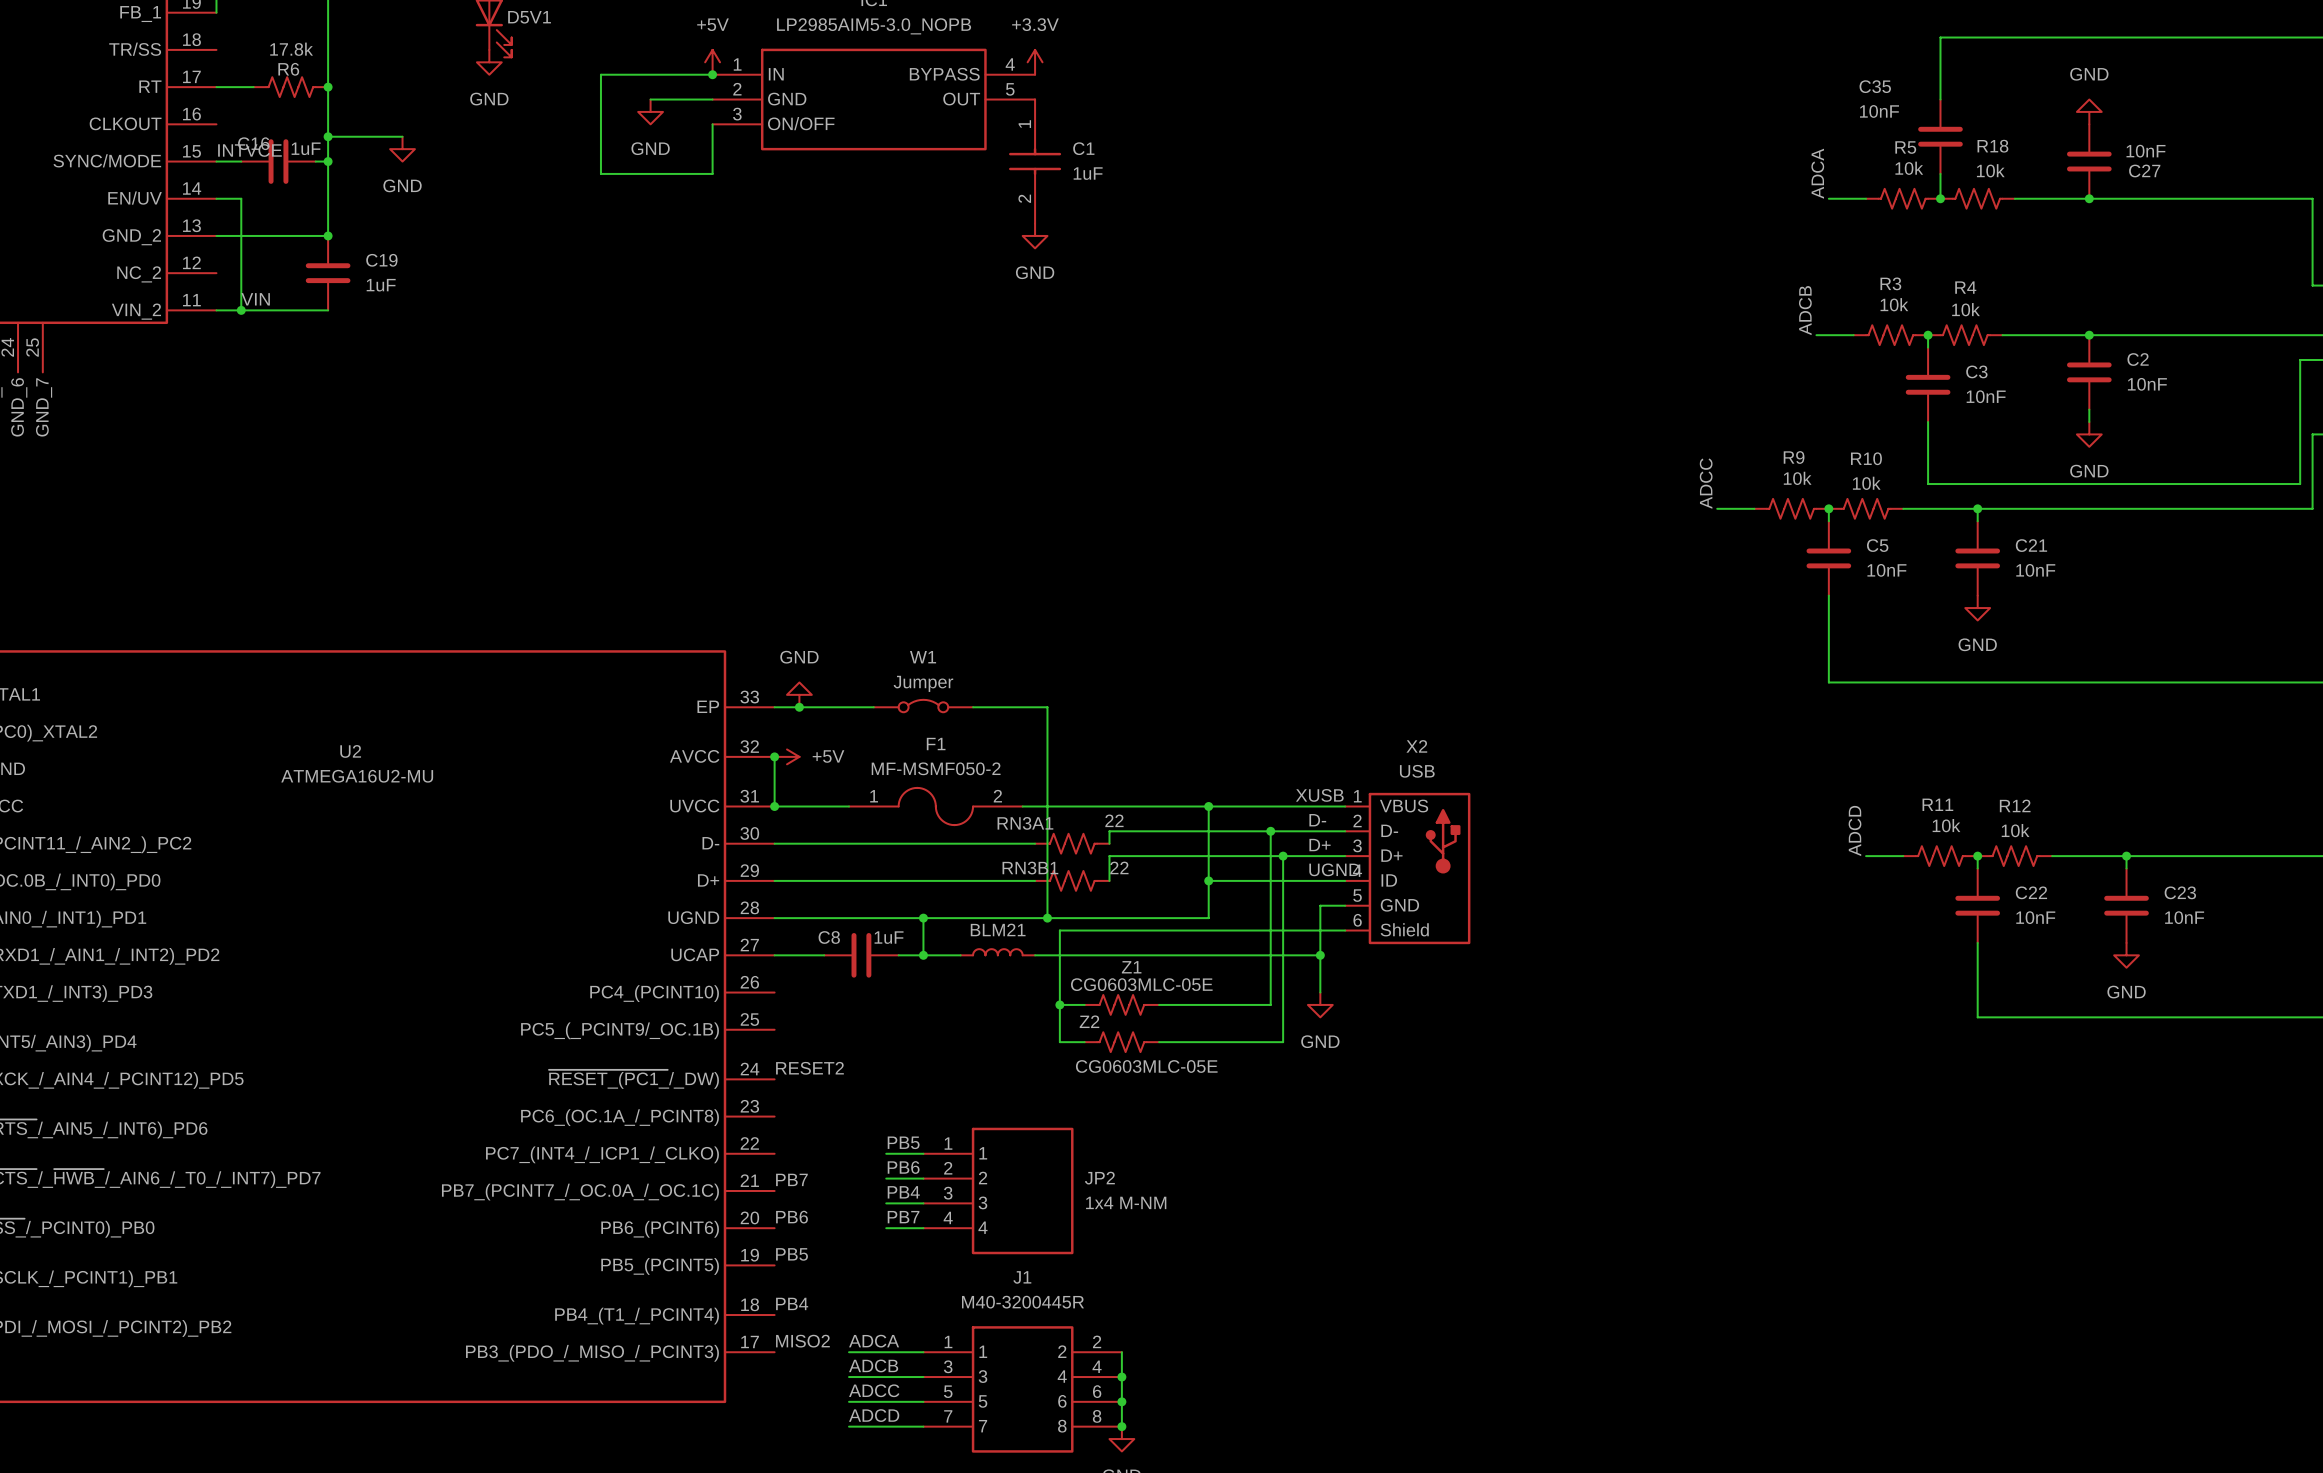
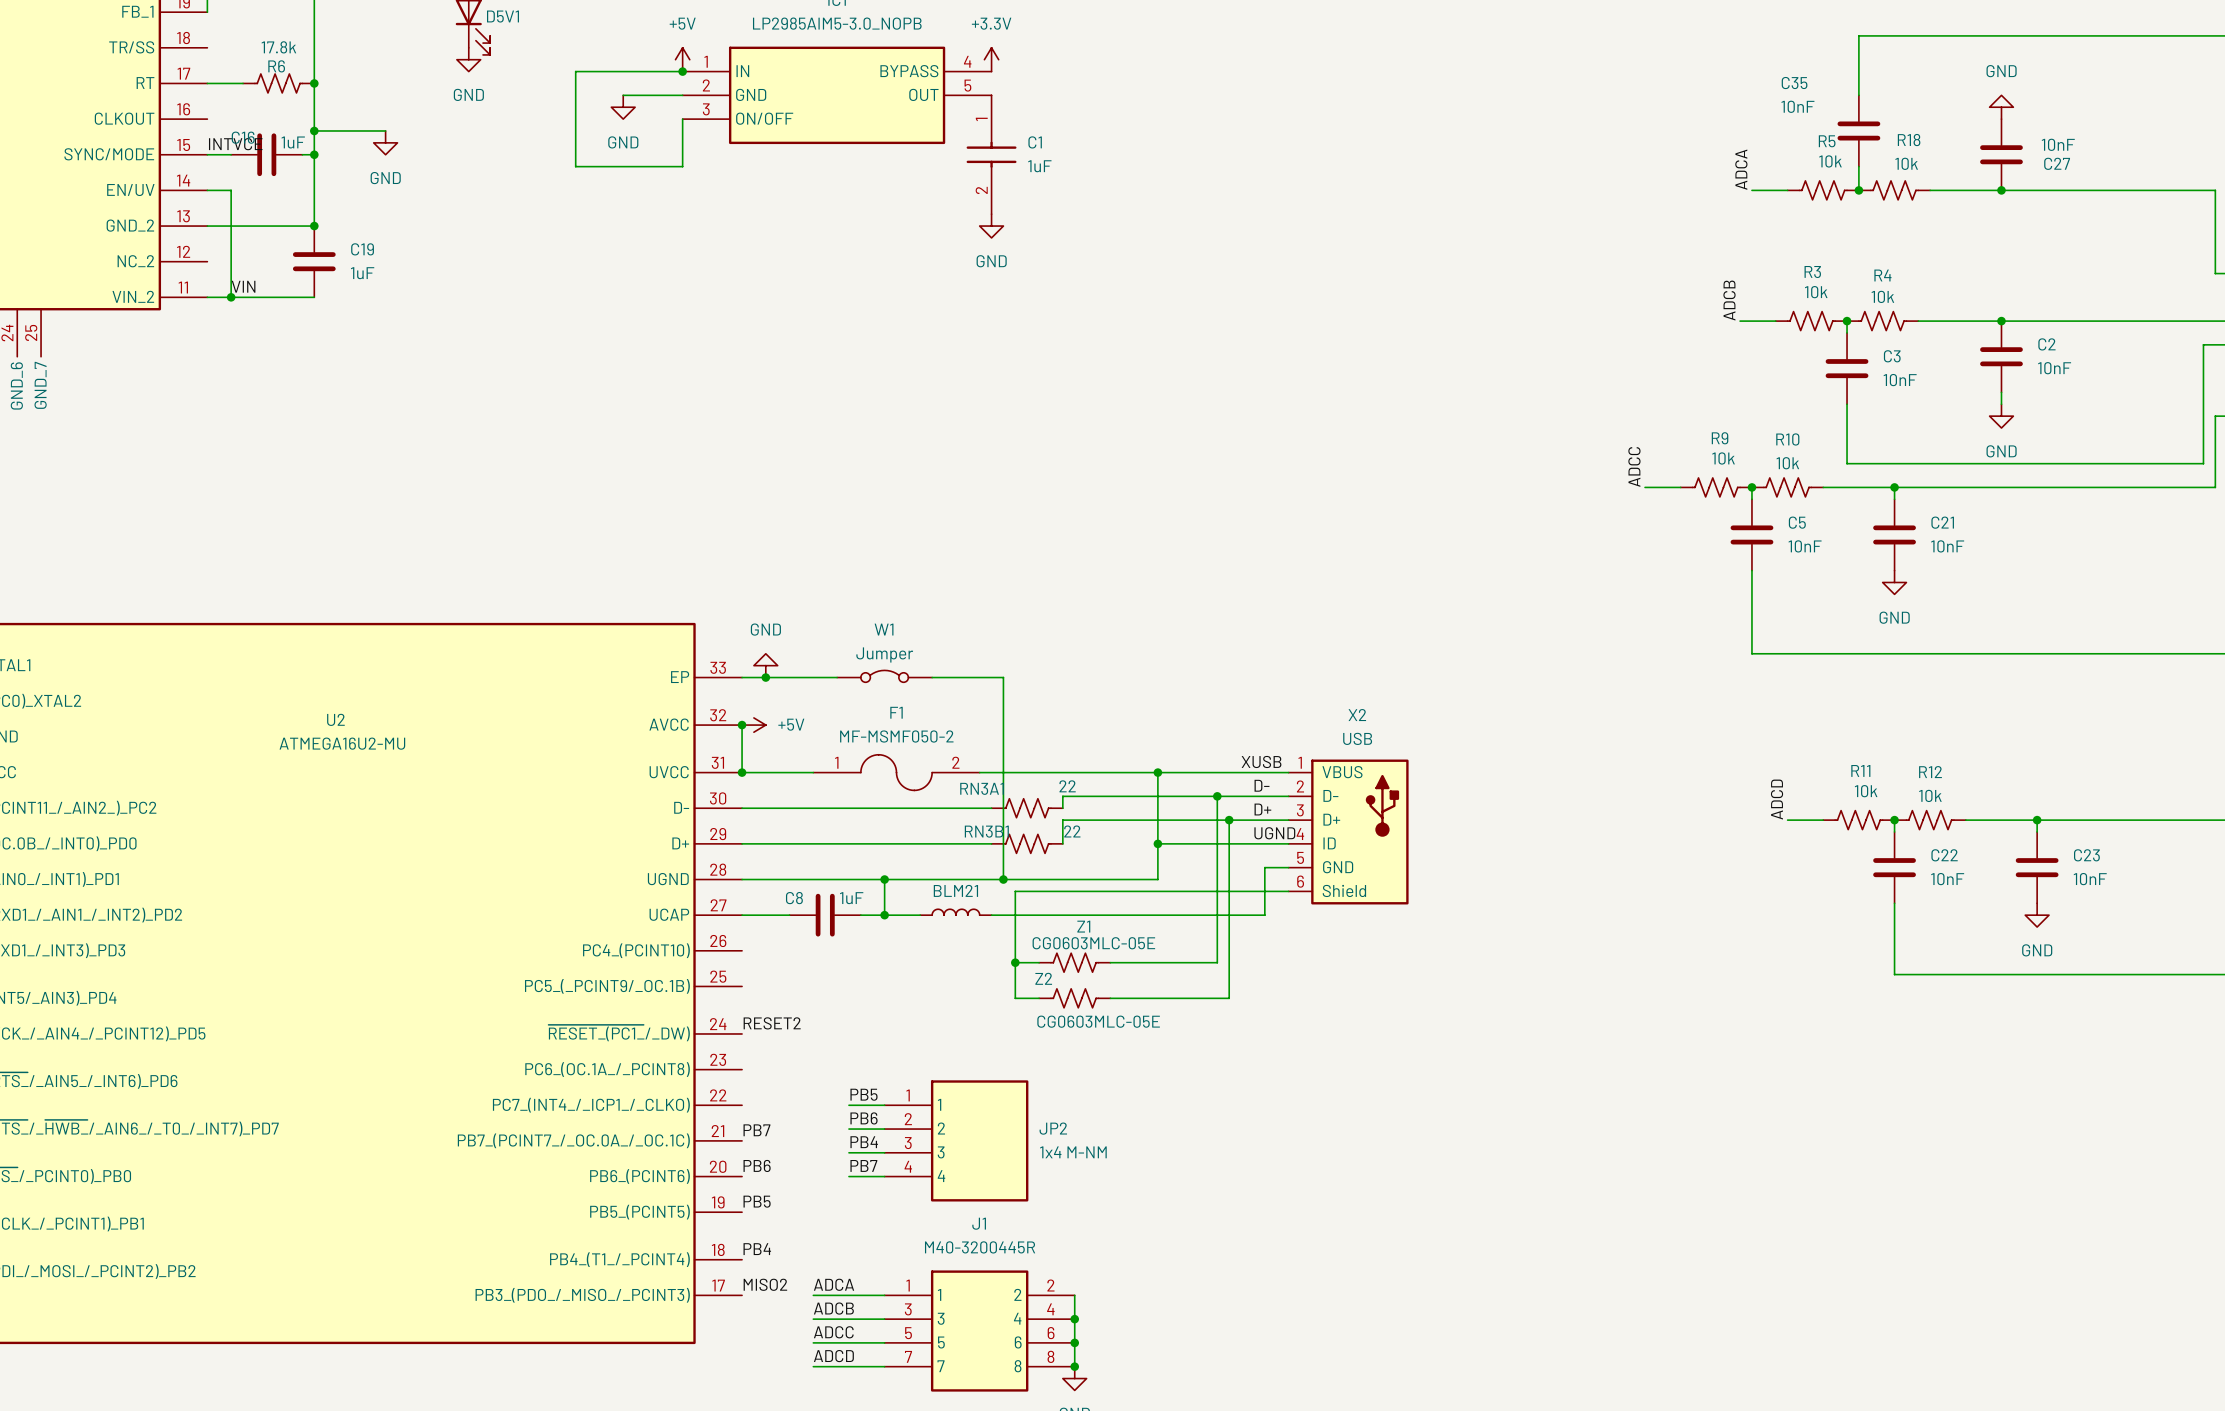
wire: (1320, 955) (1320, 992) -> none
junction: (1320, 955) -> none
power symbol: GND (1320, 1004) -> none

